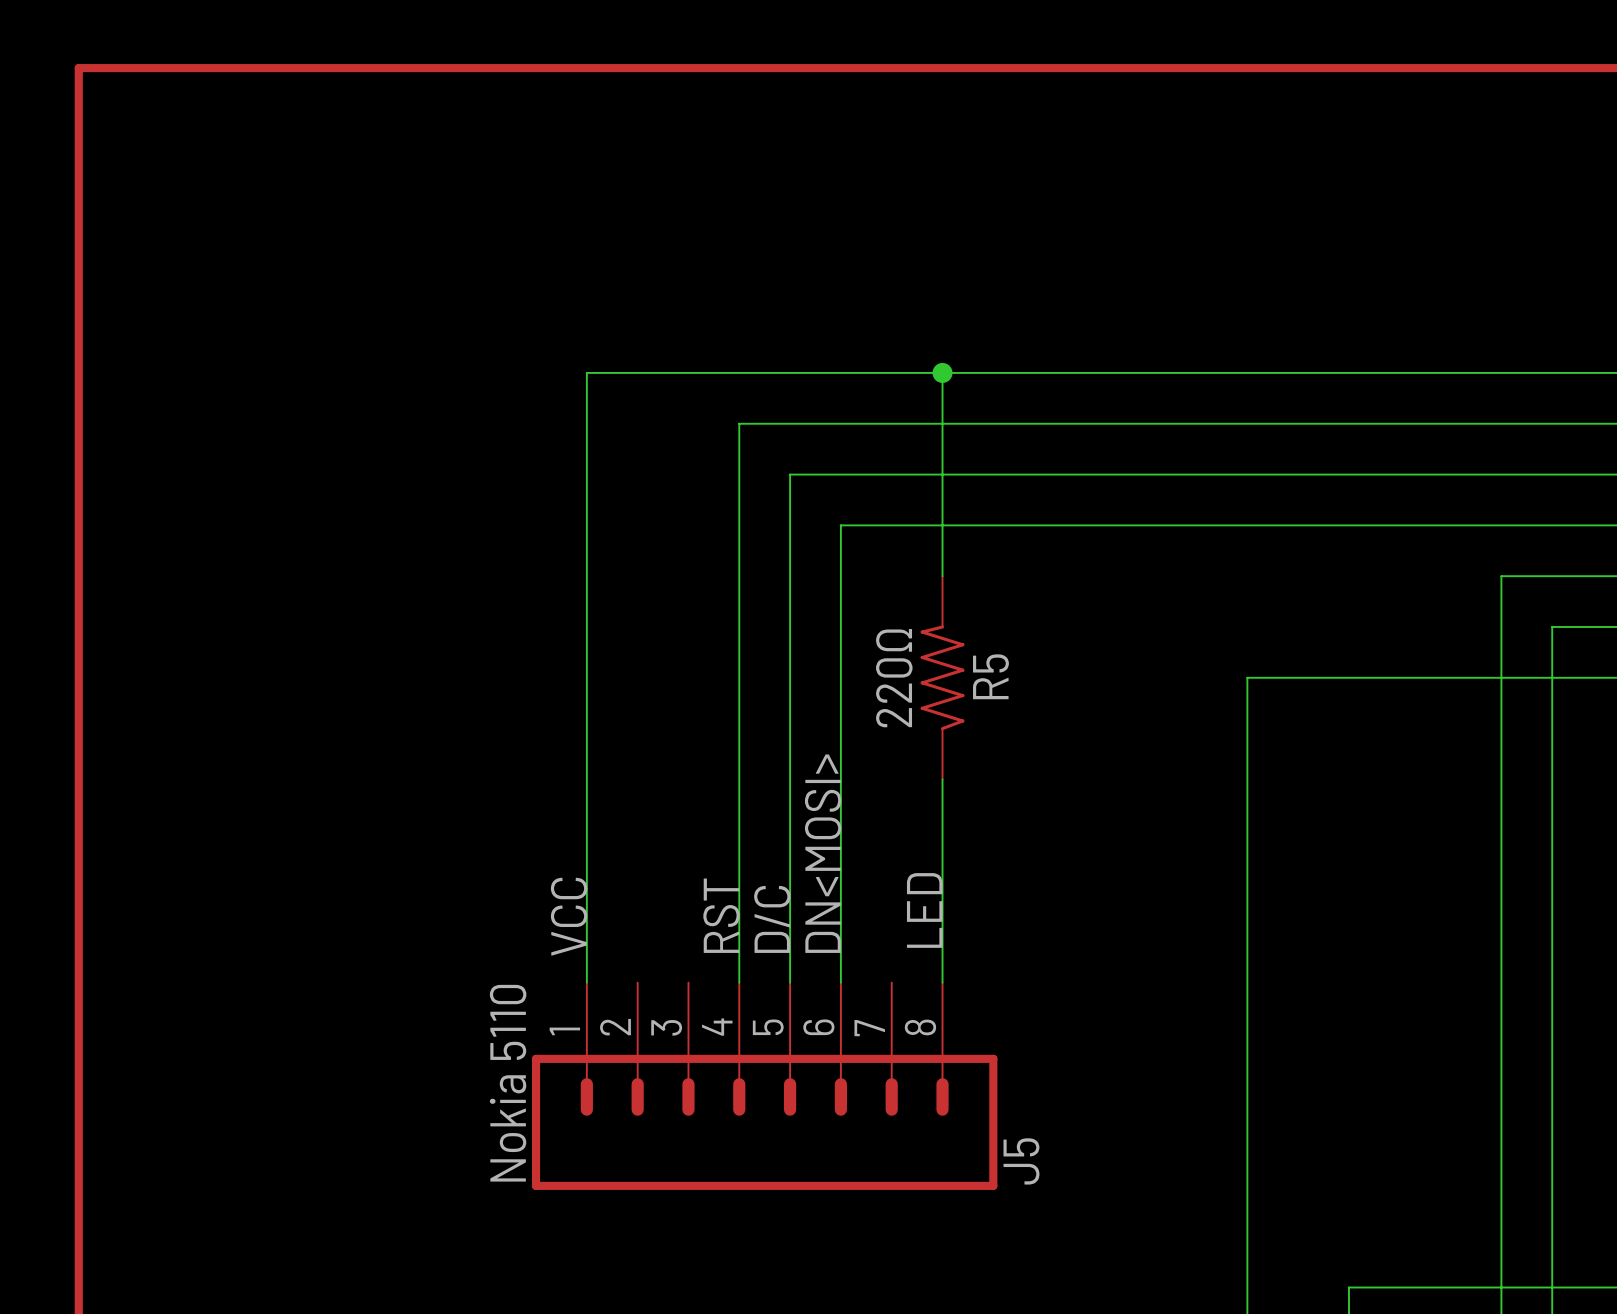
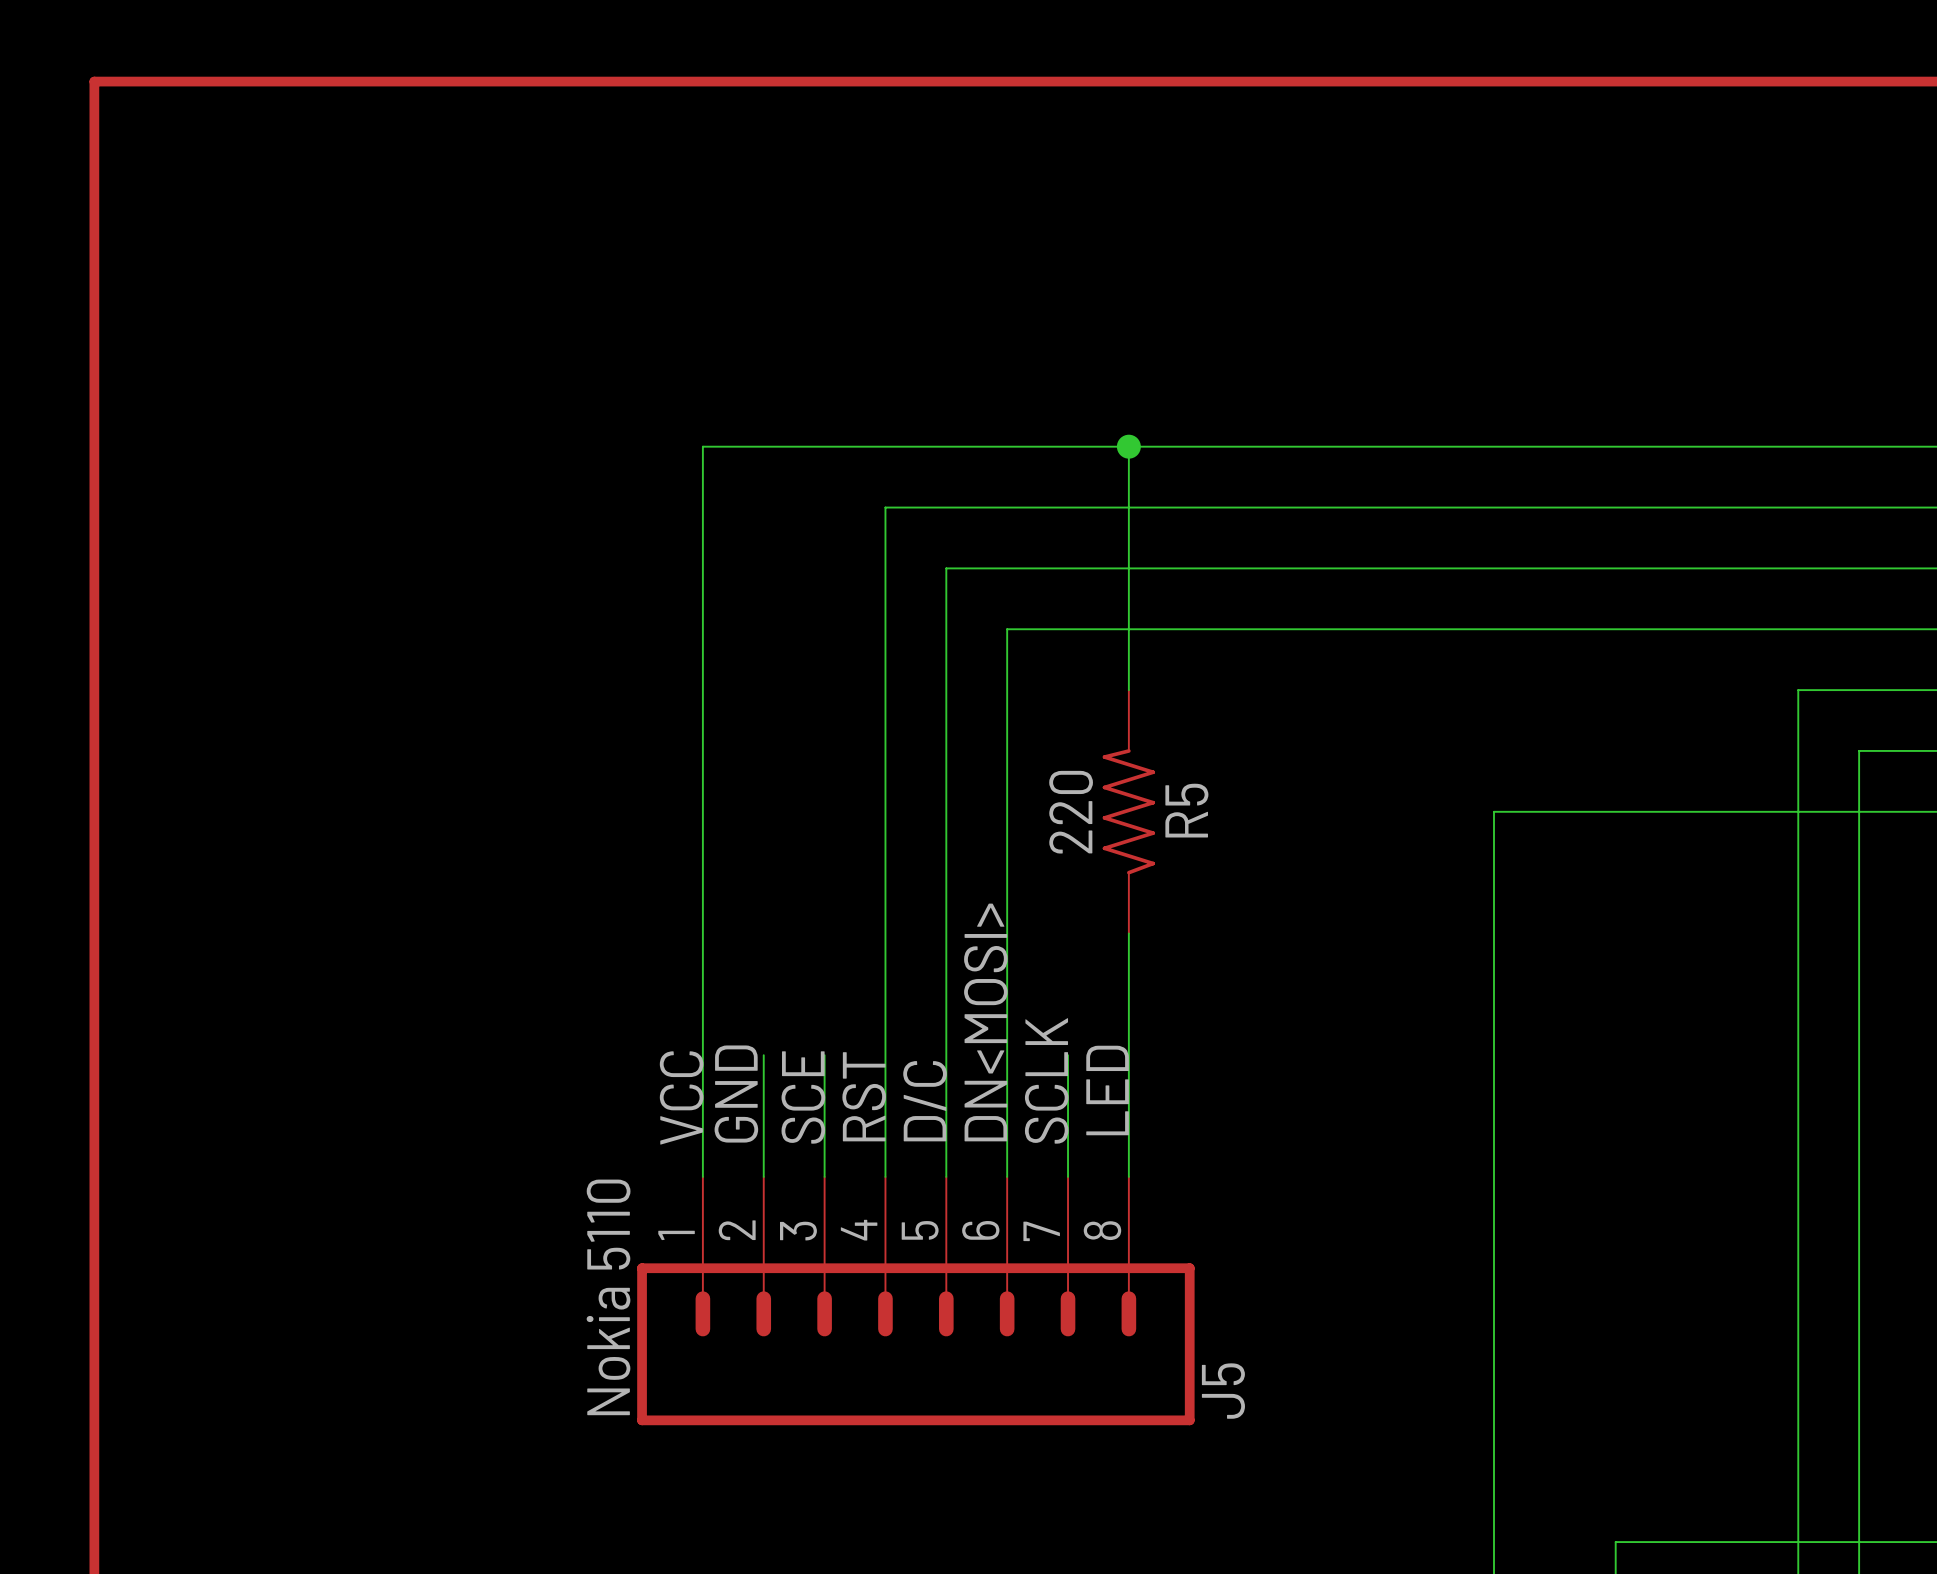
R5 value: 220Ω (894, 678) -> 220 (1071, 812)
wire: none -> (763, 1055) (763, 1176)
wire: none -> (824, 1055) (824, 1176)
wire: none -> (1068, 1055) (1068, 1176)
label: none -> SCLK (1046, 1080)
label: none -> GND (736, 1094)
label: none -> SCE (803, 1097)

